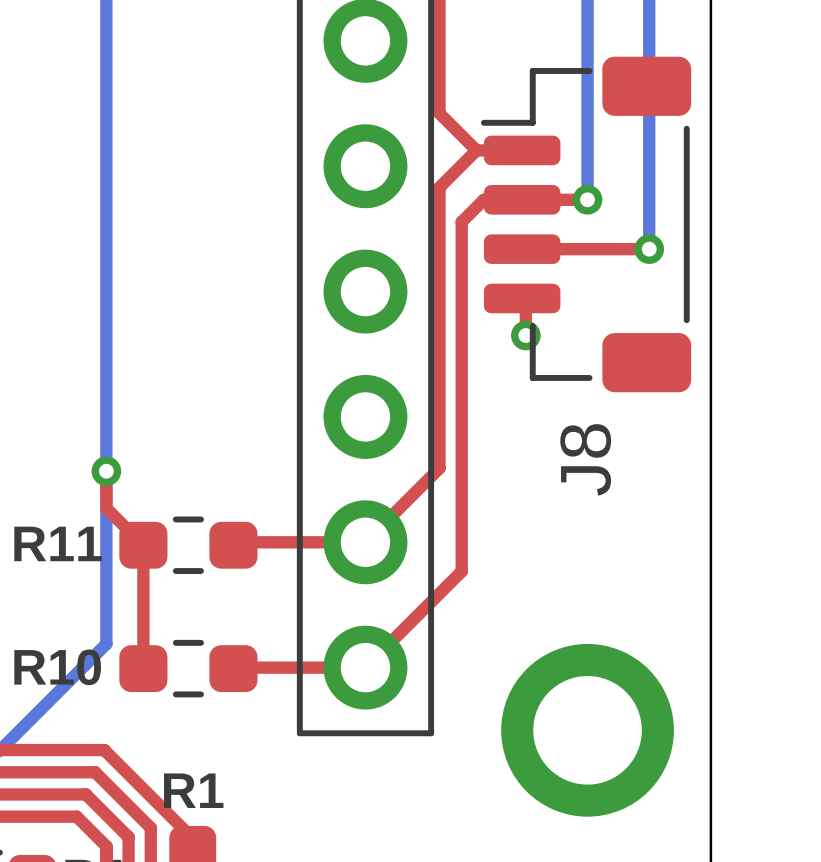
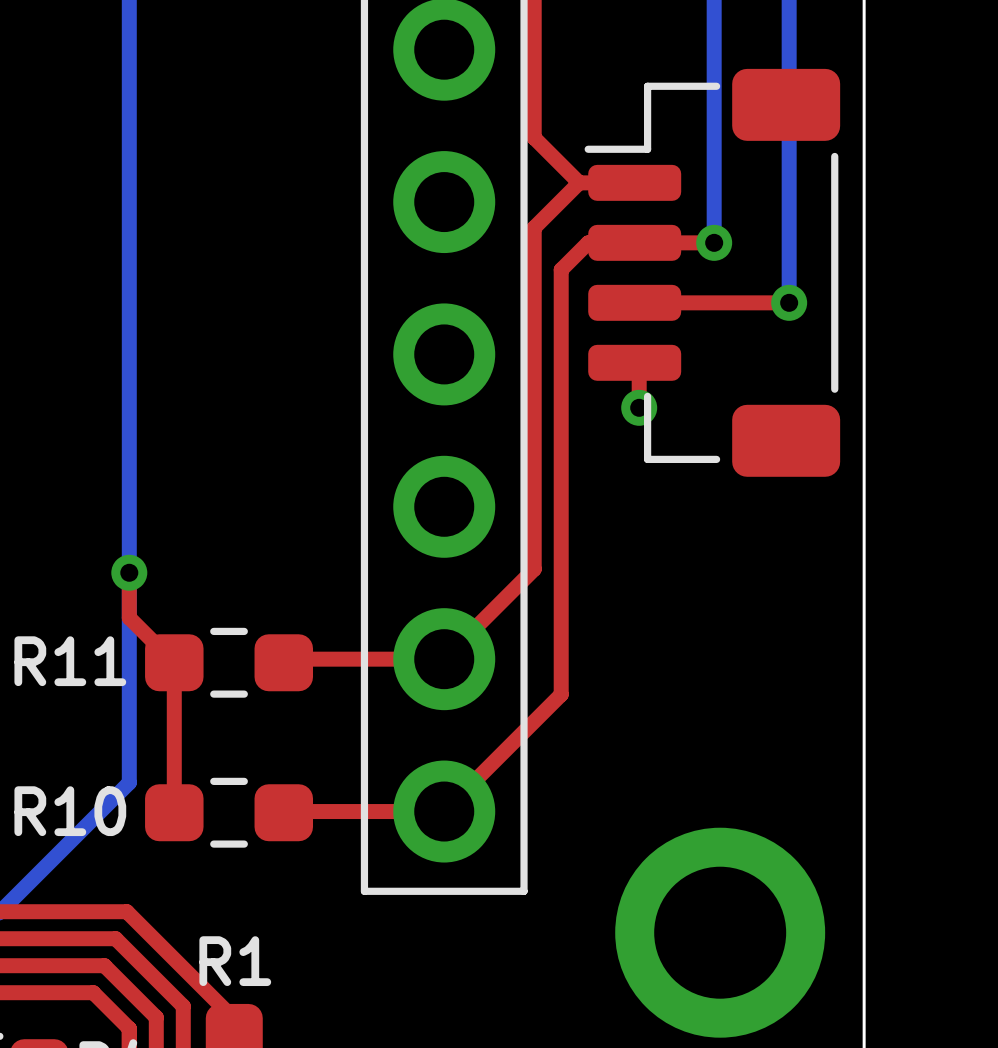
J8 name: J8 (585, 459) -> none
part position: (587, 730) -> (720, 932)

